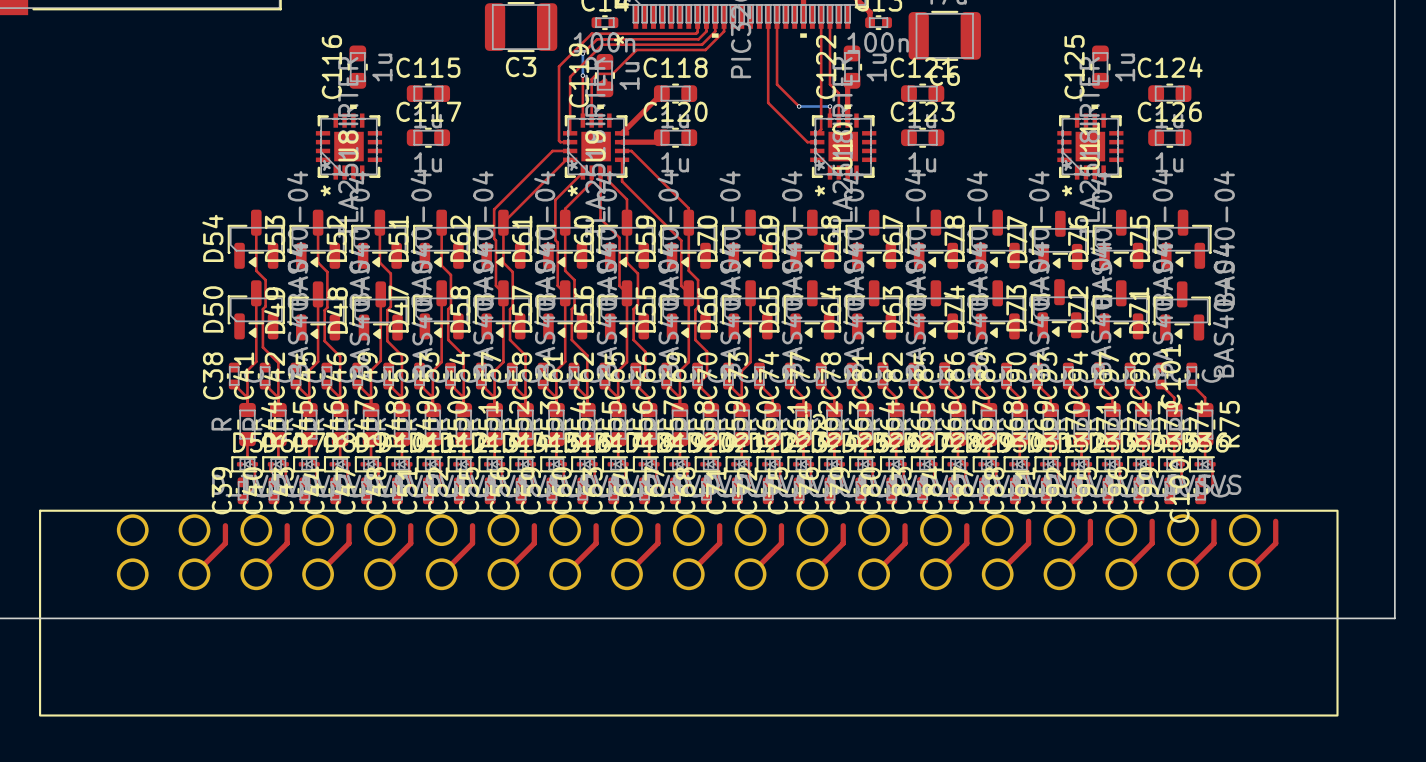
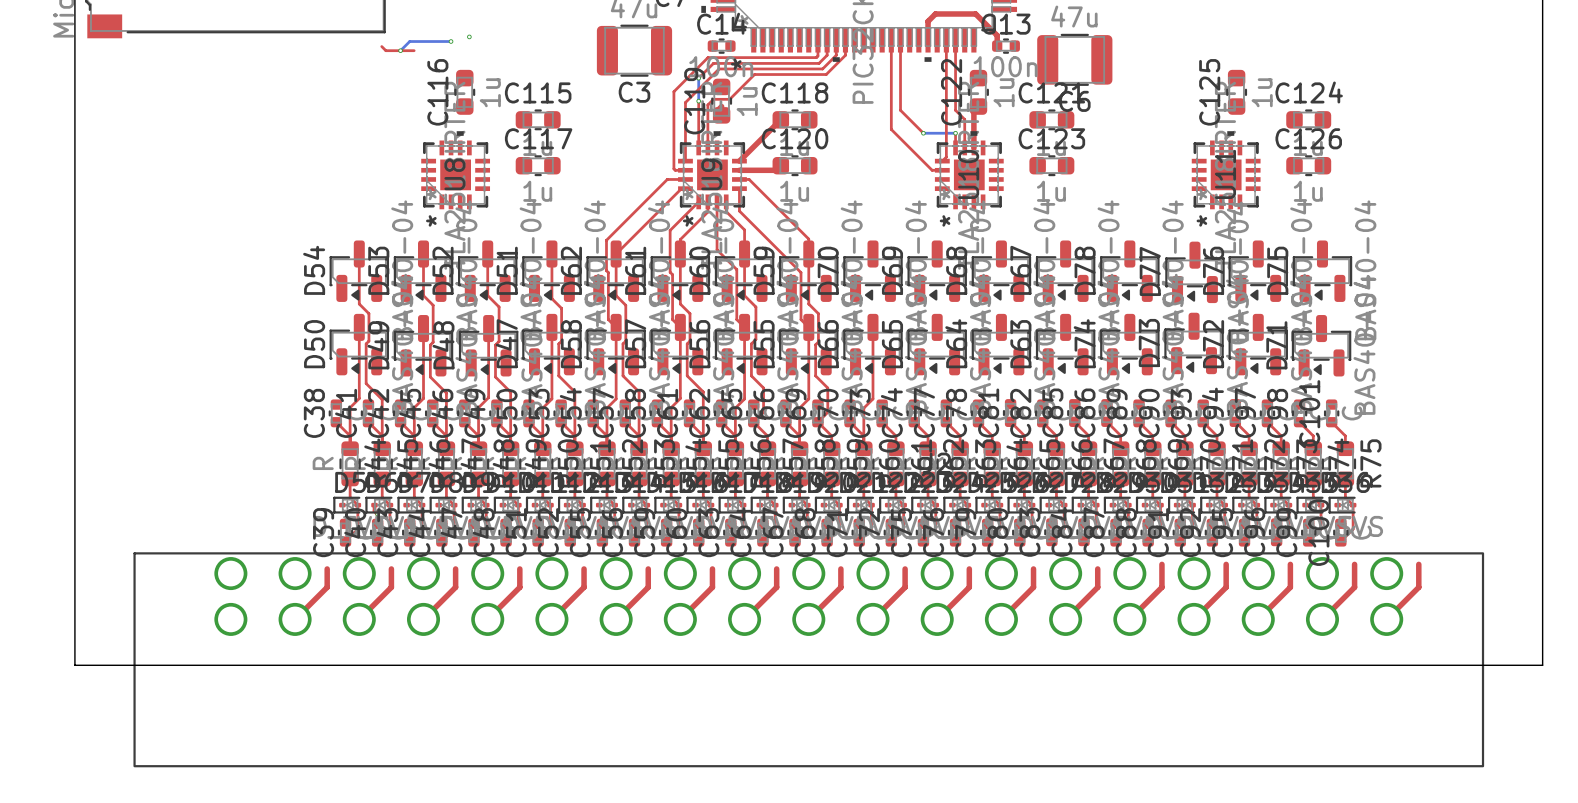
via: none -> (469, 36)
bottom track: none -> (451, 41) (409, 41) (400, 50)
via: none -> (451, 41)
top track: none -> (381, 46) (385, 50) (414, 50)
via: none -> (400, 50)

